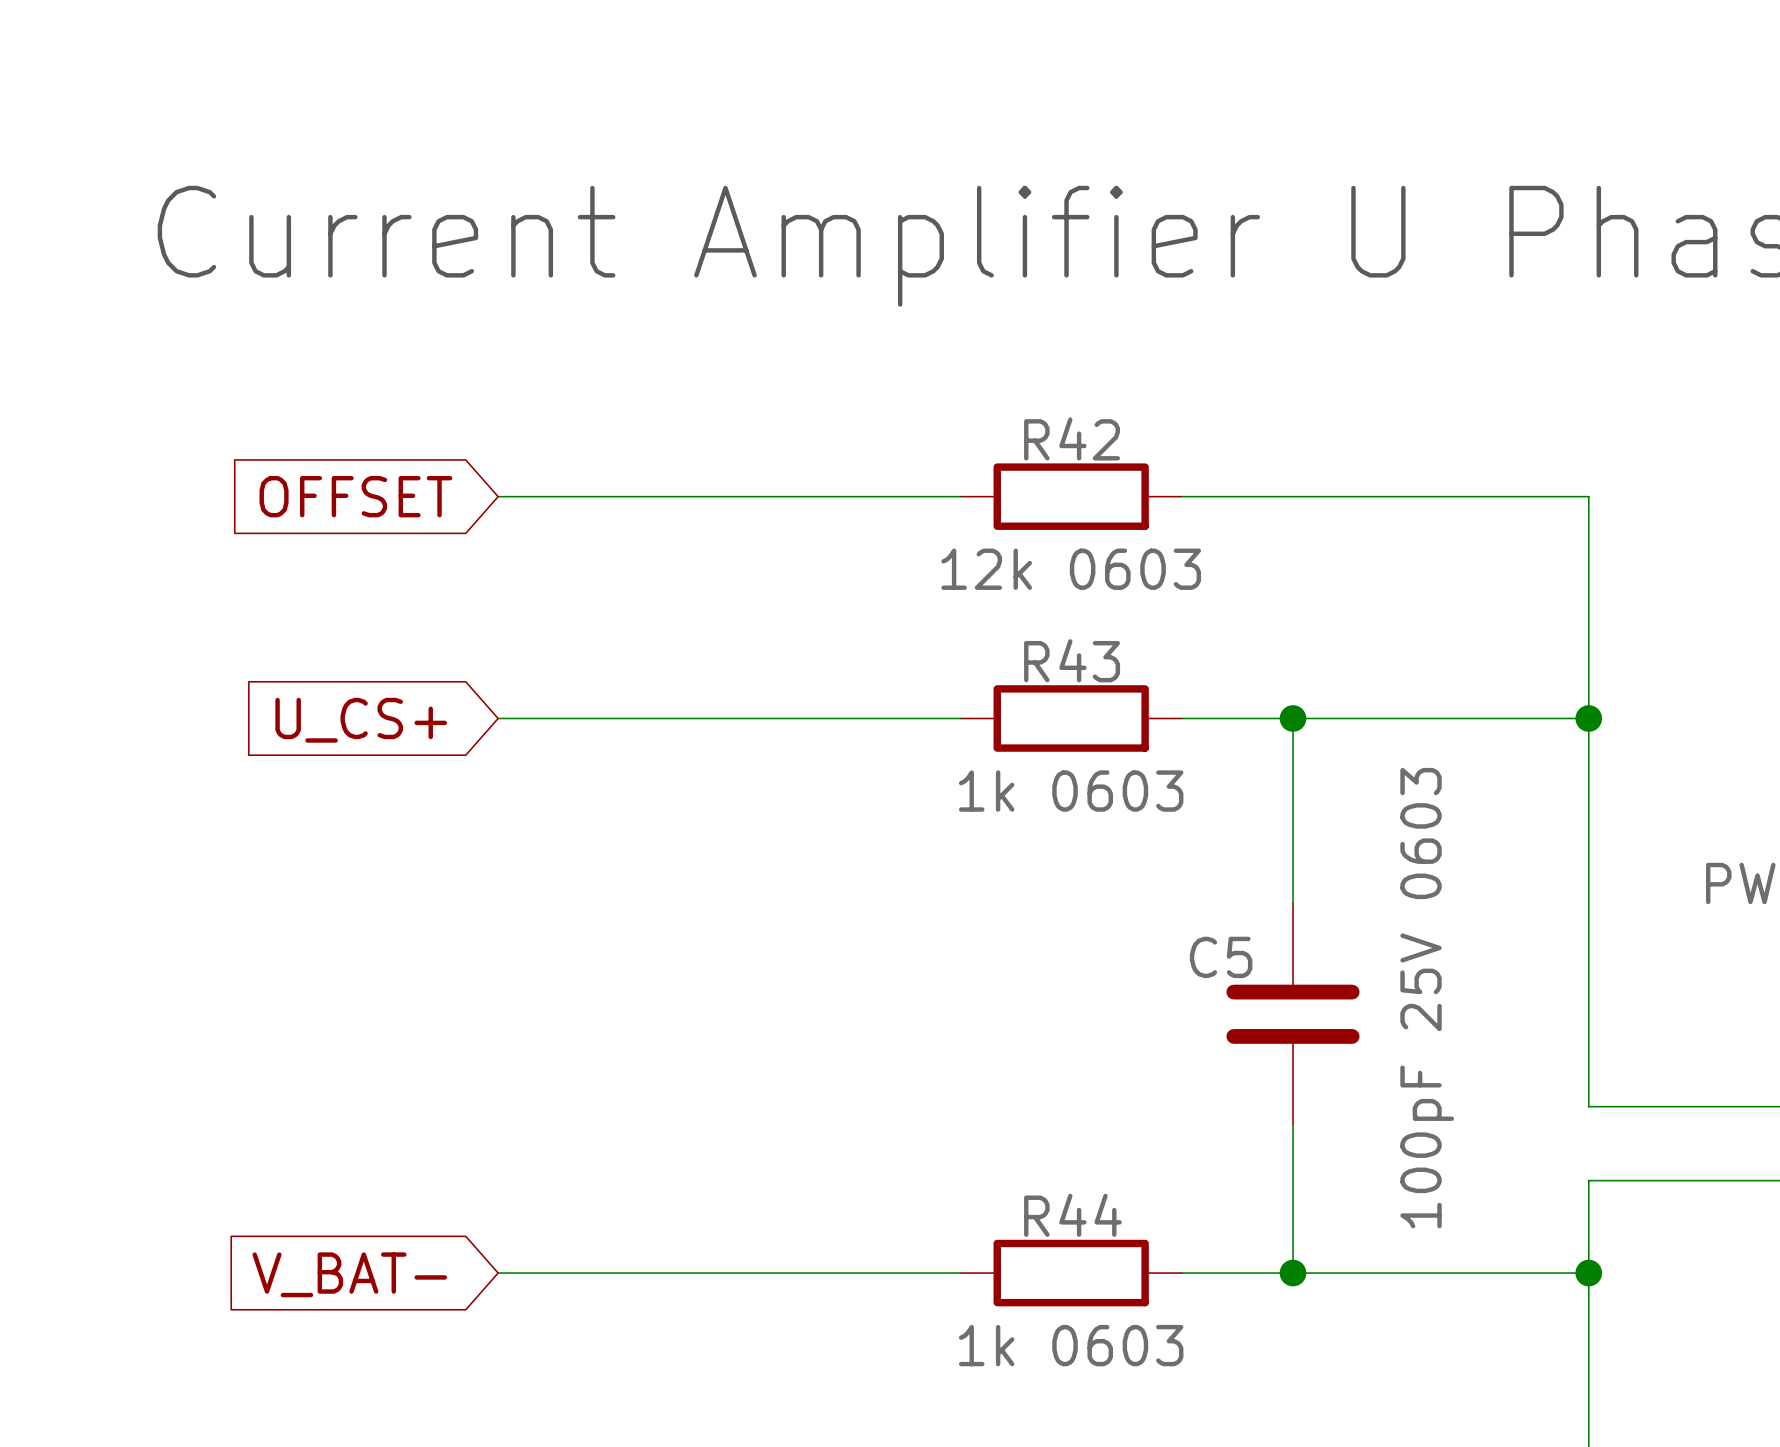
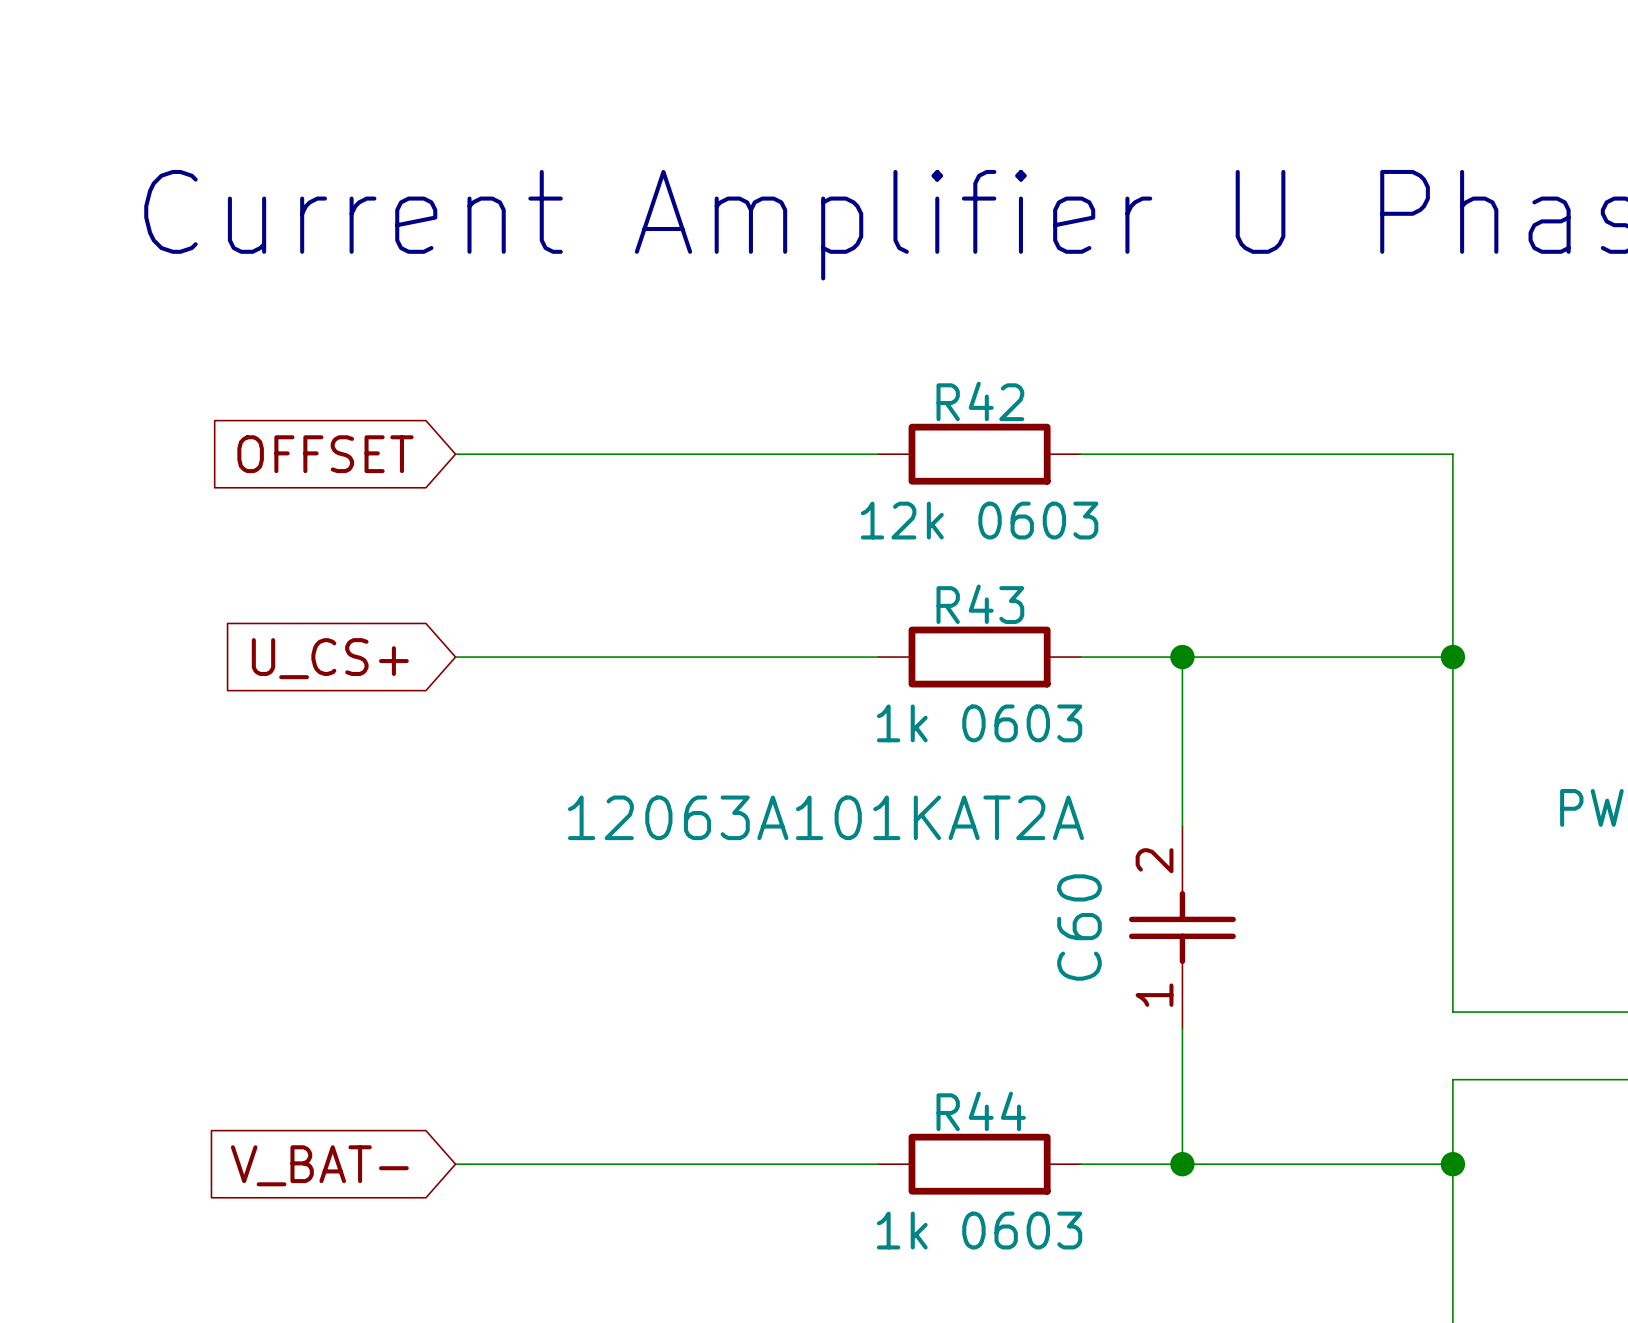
C5: 100pF 25V 0603 (1293, 1014) -> none
C60: none -> 12063A101KAT2A (1182, 927)

